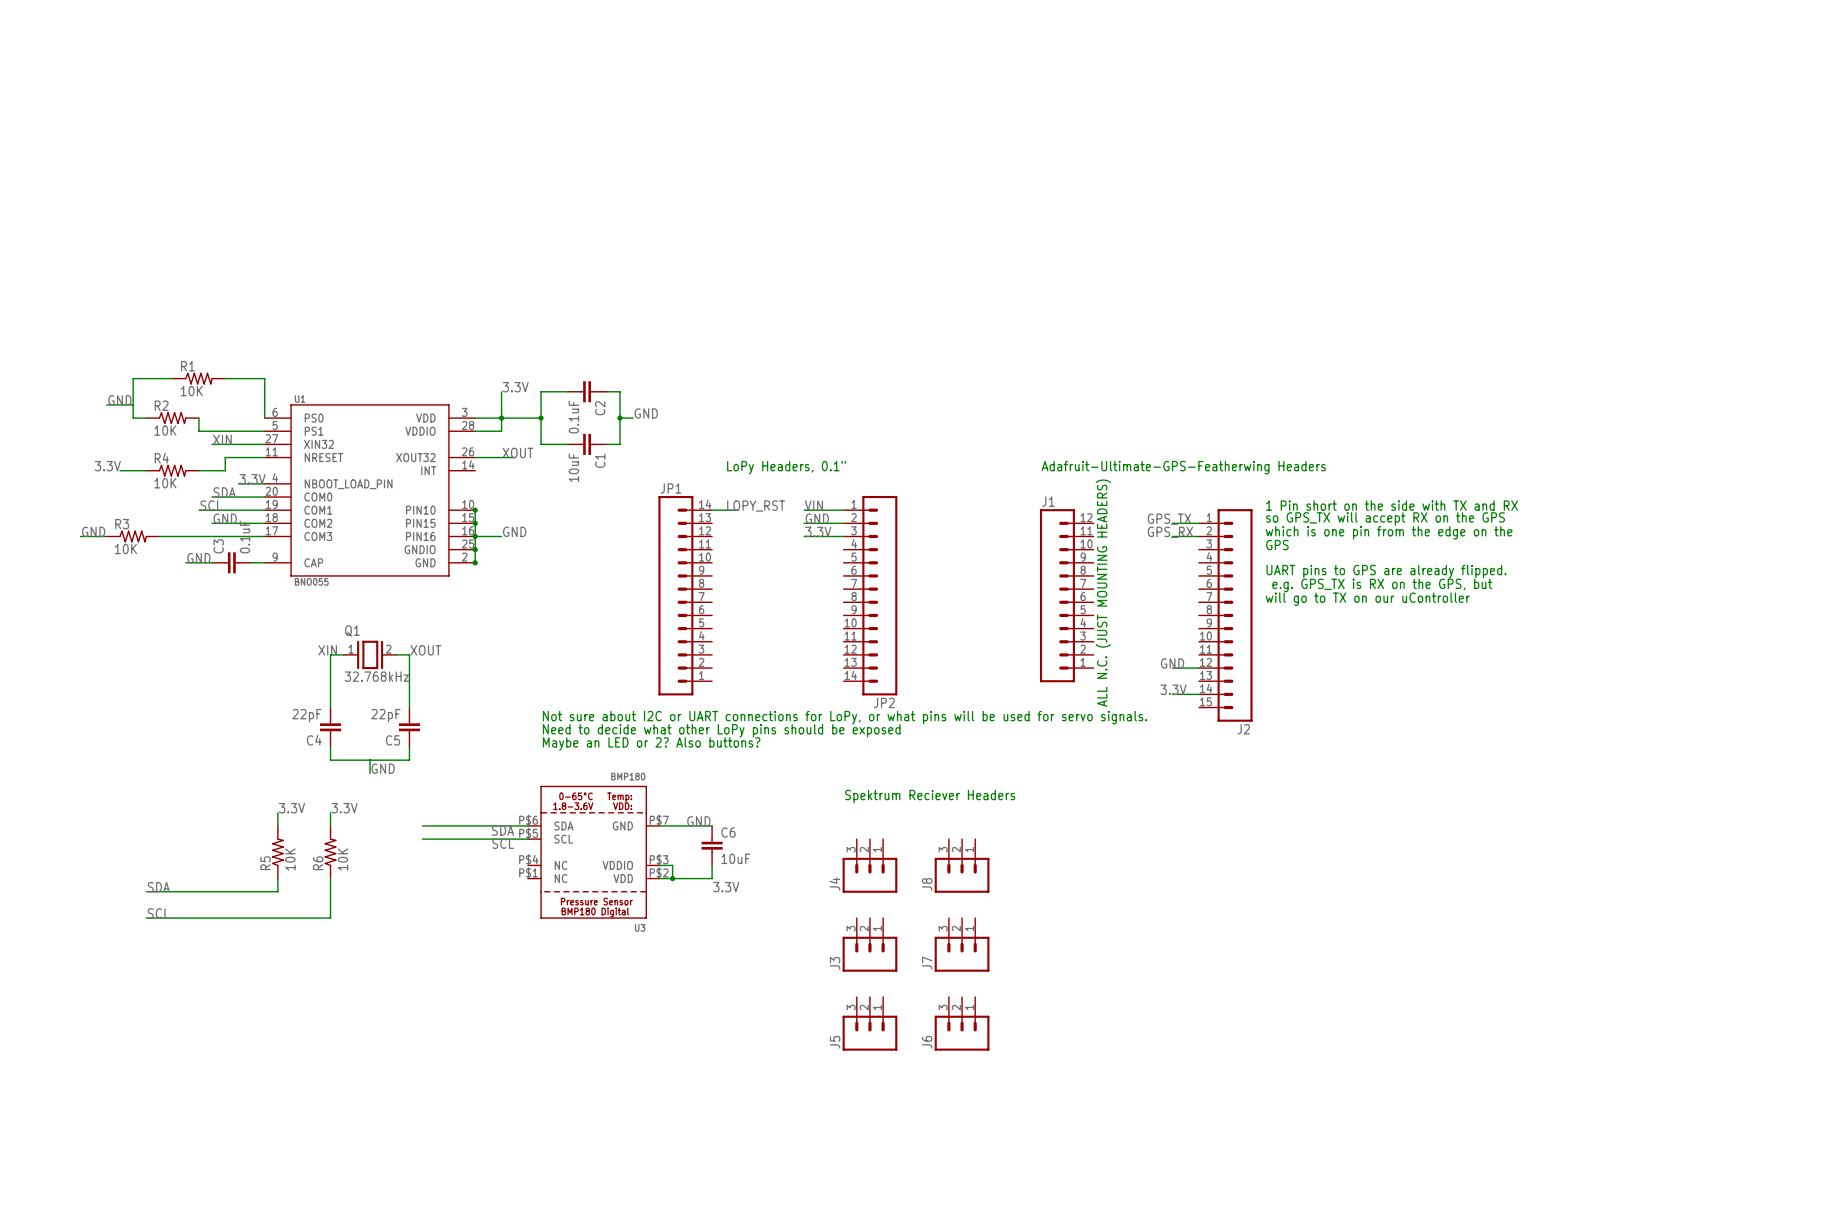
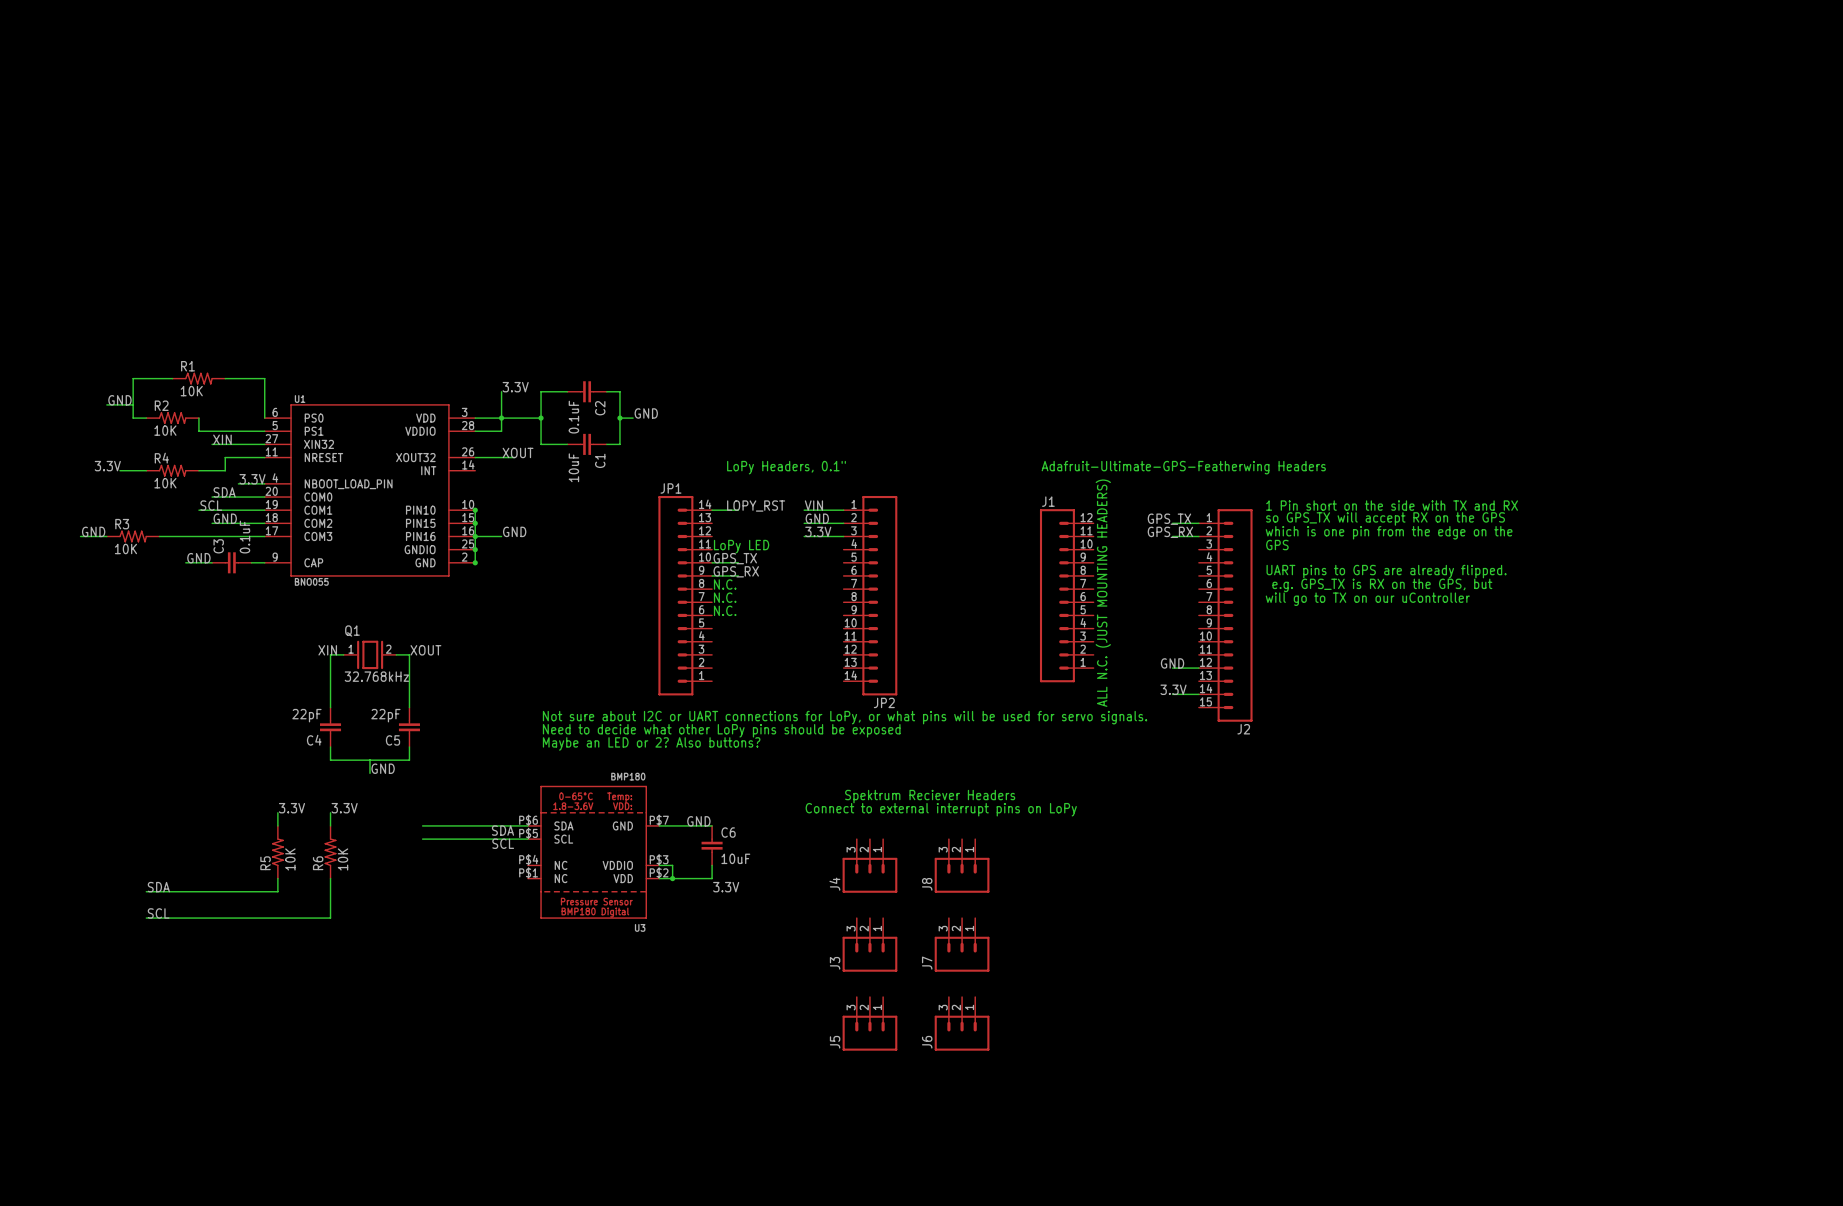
text: none -> LoPy LED (741, 546)
label: none -> GPS_TX (735, 558)
wire: none -> (712, 562) (738, 562)
label: none -> GPS_RX (736, 571)
wire: none -> (712, 575) (738, 575)
text: none -> N.C. (725, 584)
text: none -> N.C. (725, 597)
text: none -> N.C. (725, 610)
text: none -> Connect to external interrupt pins on LoPy (941, 809)

